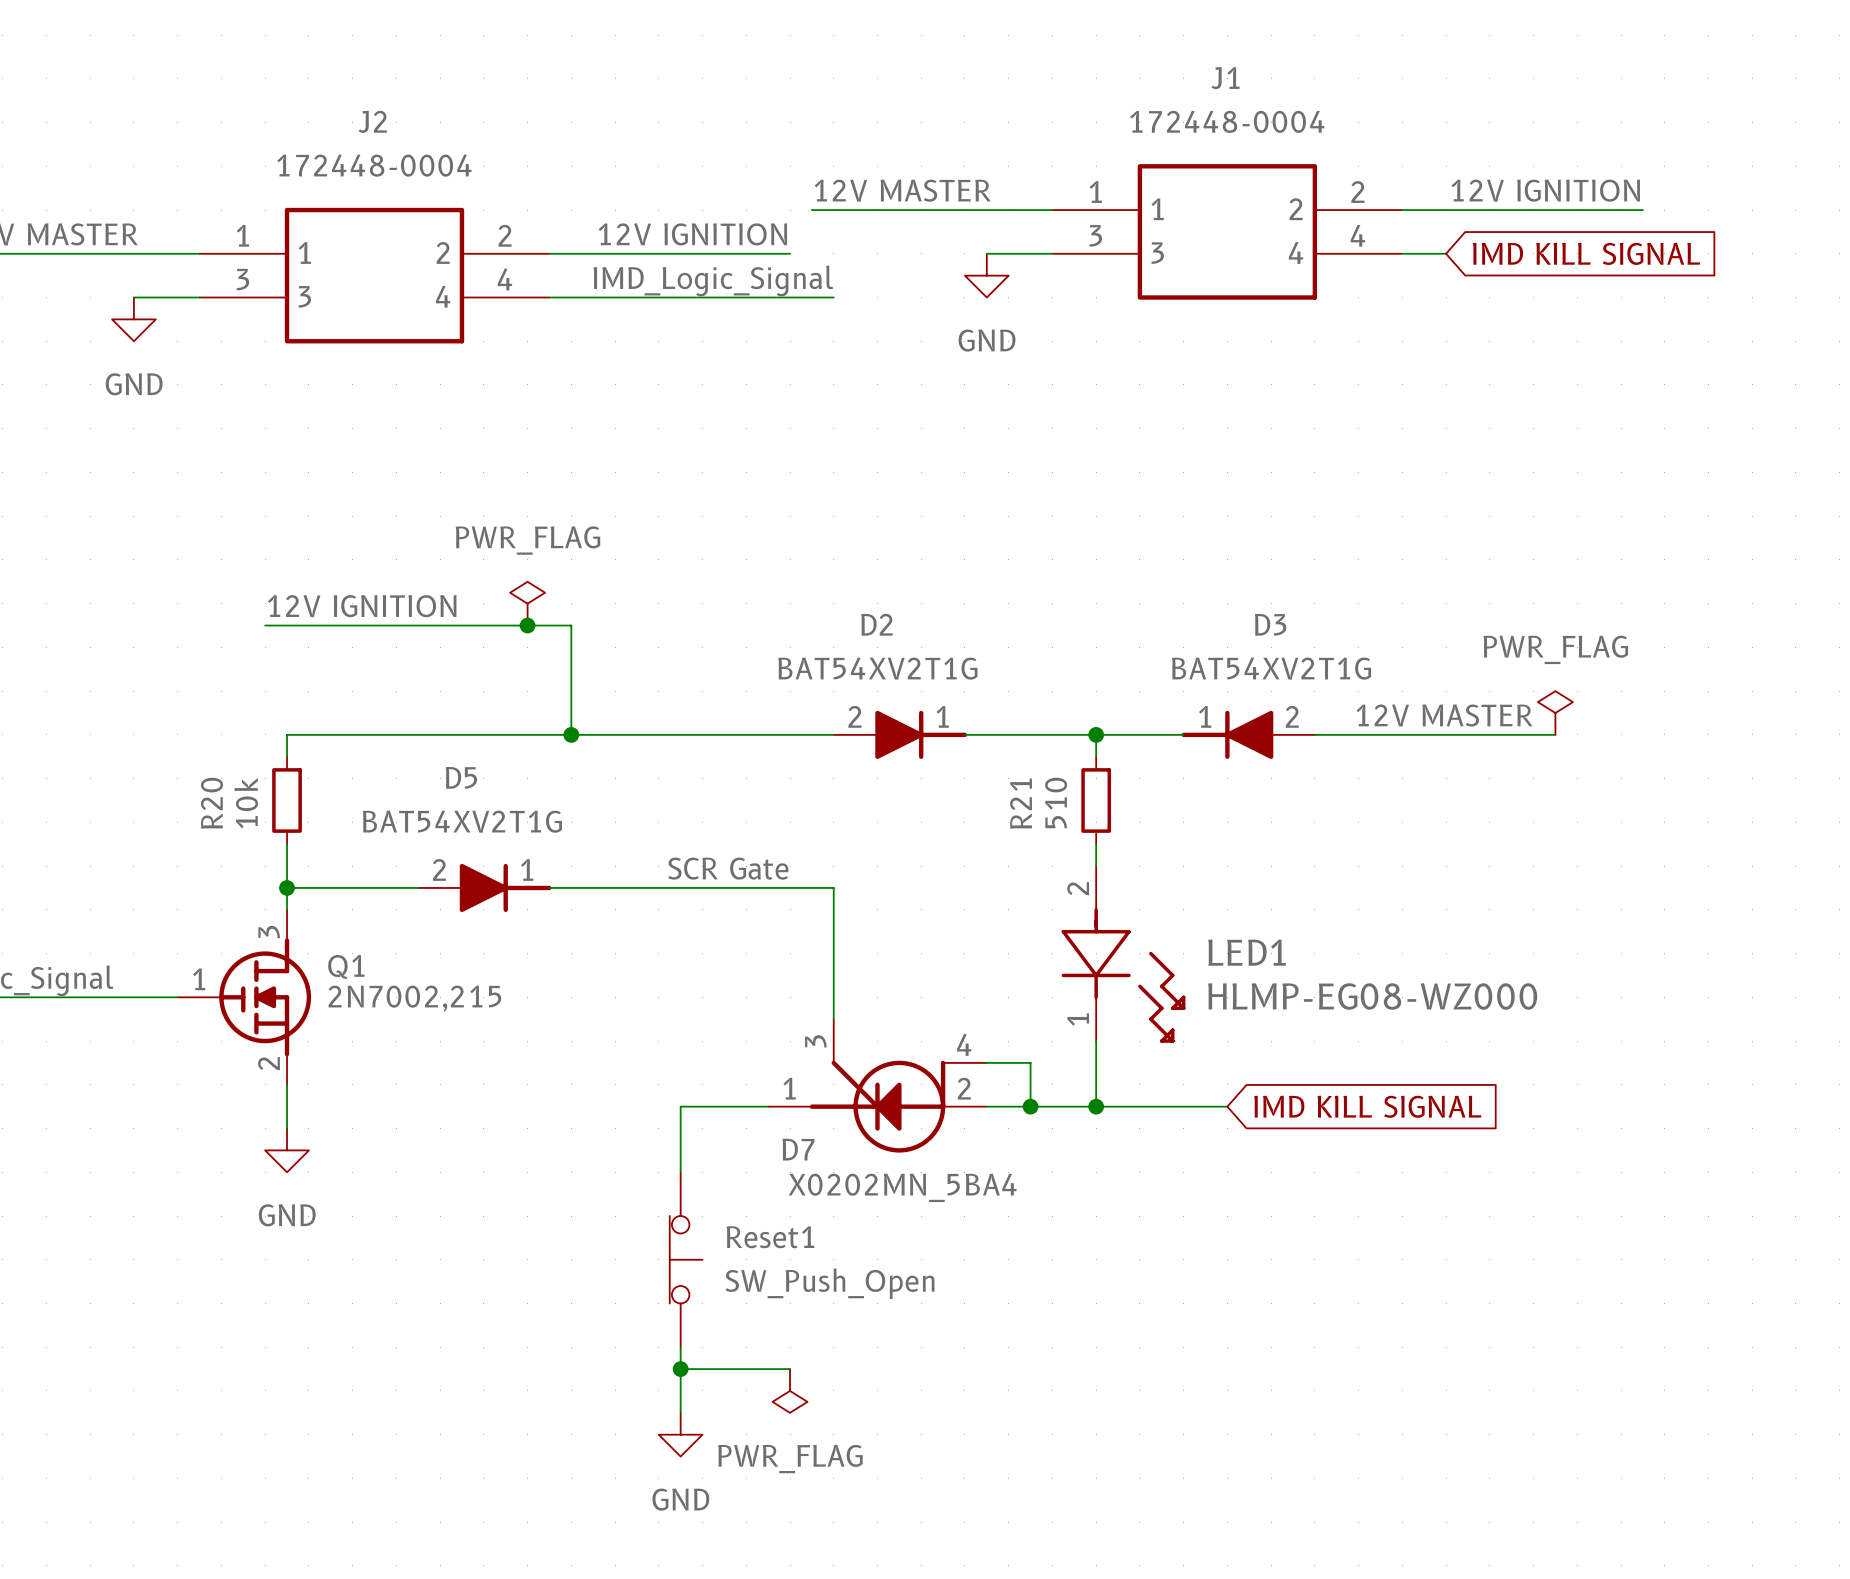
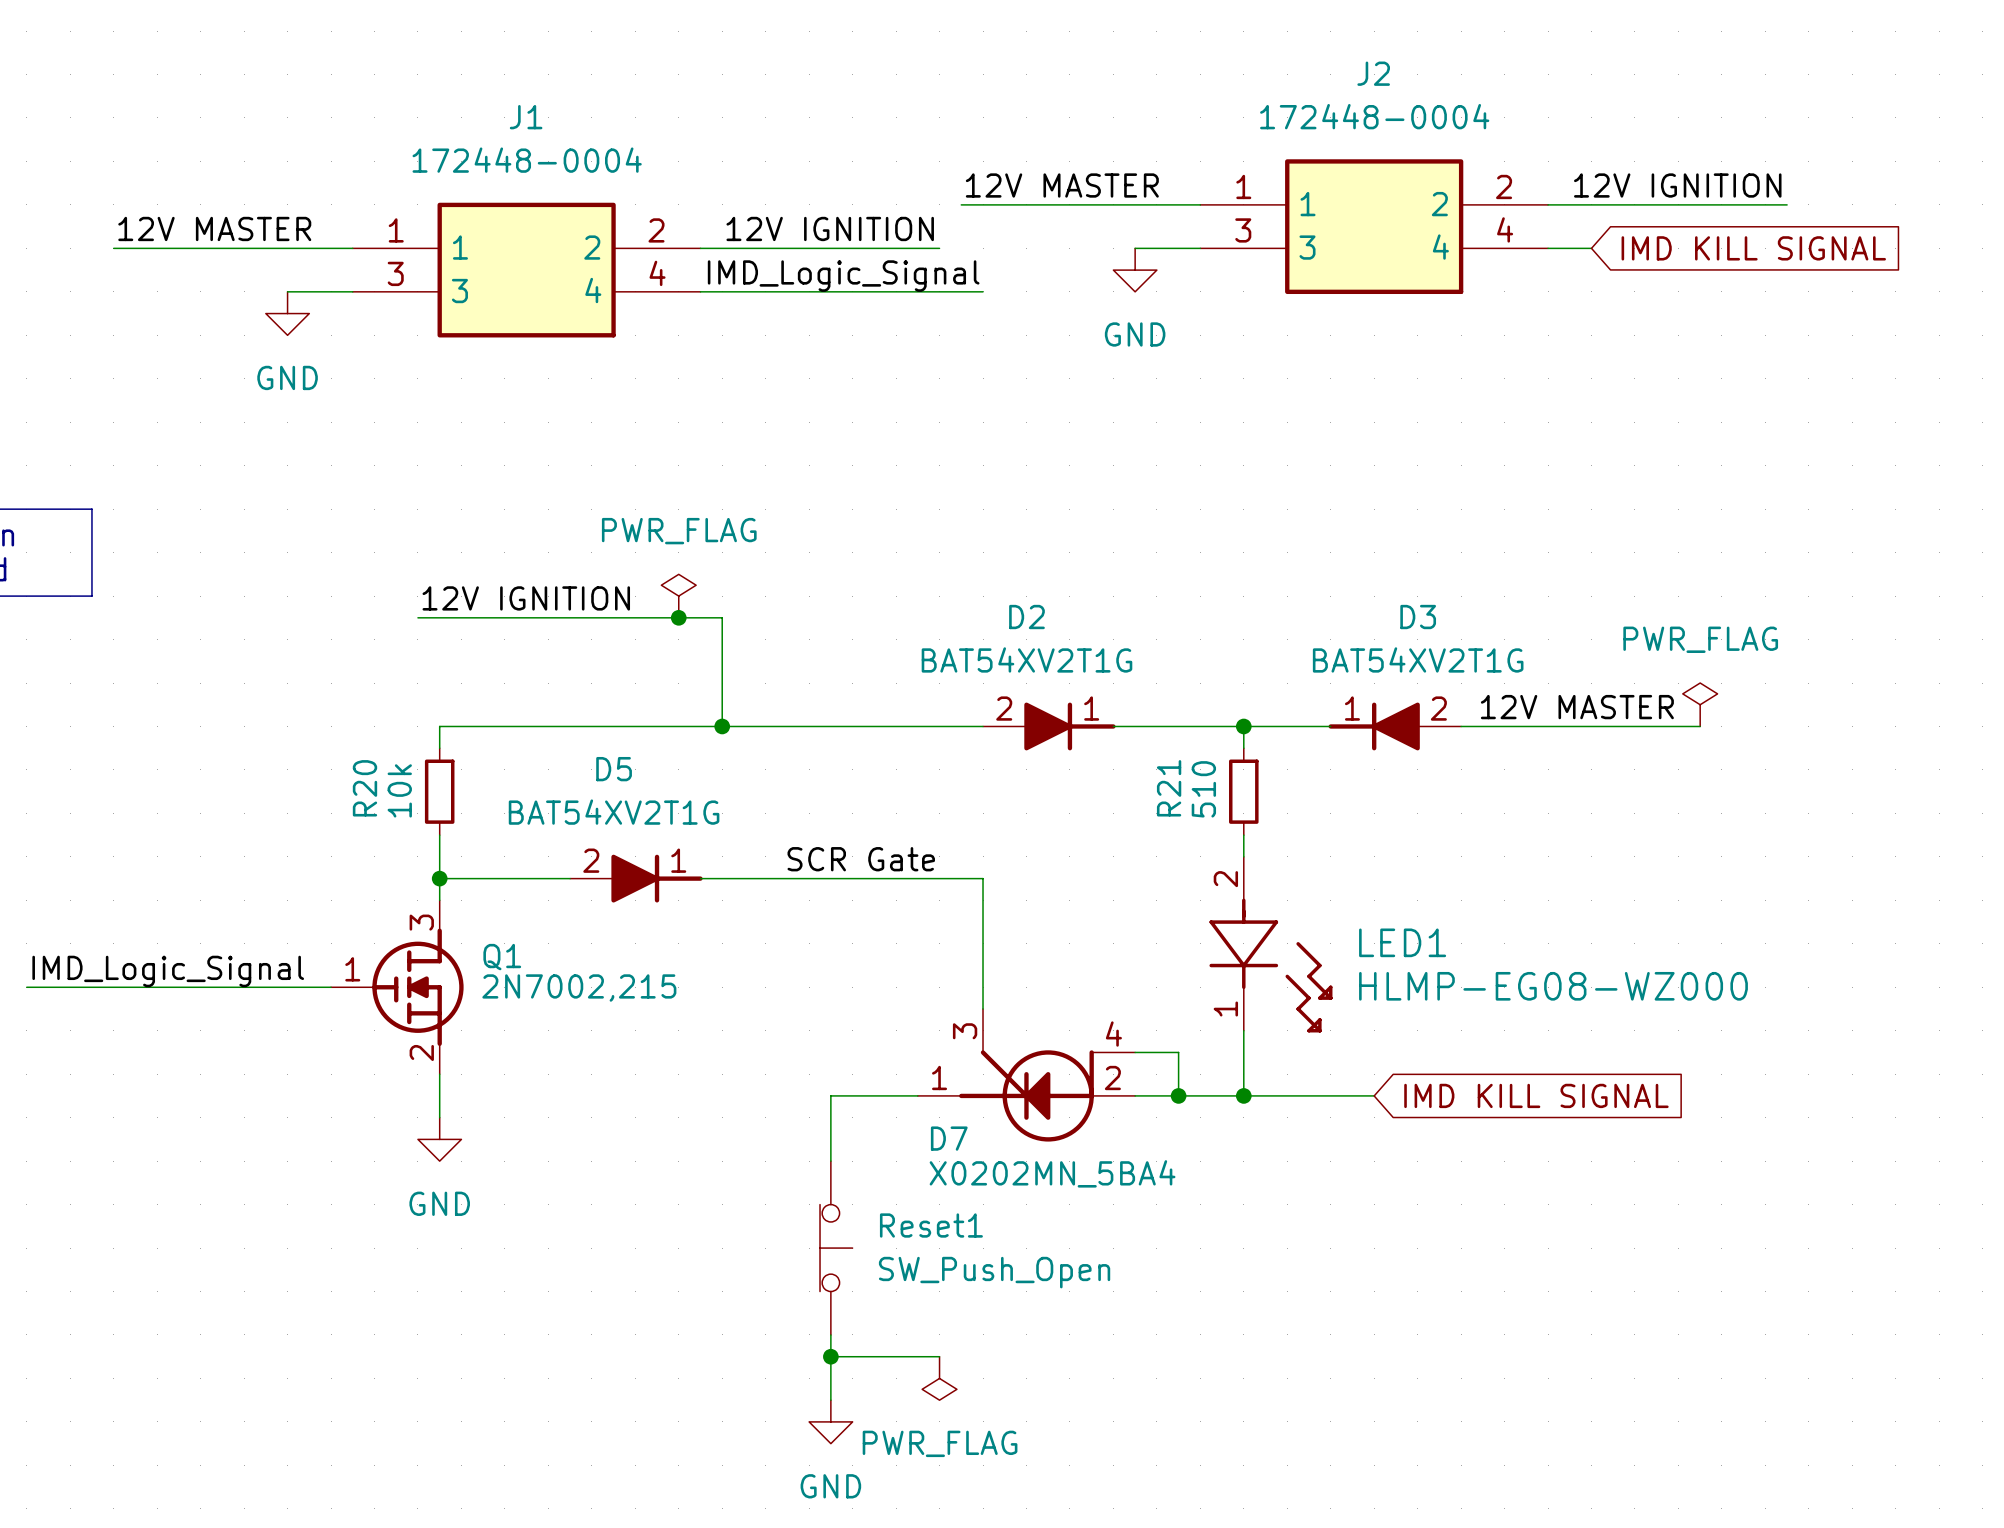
J1 name: J1 (1225, 78) -> J2 (1373, 73)
J2 name: J2 (372, 121) -> J1 (526, 117)

